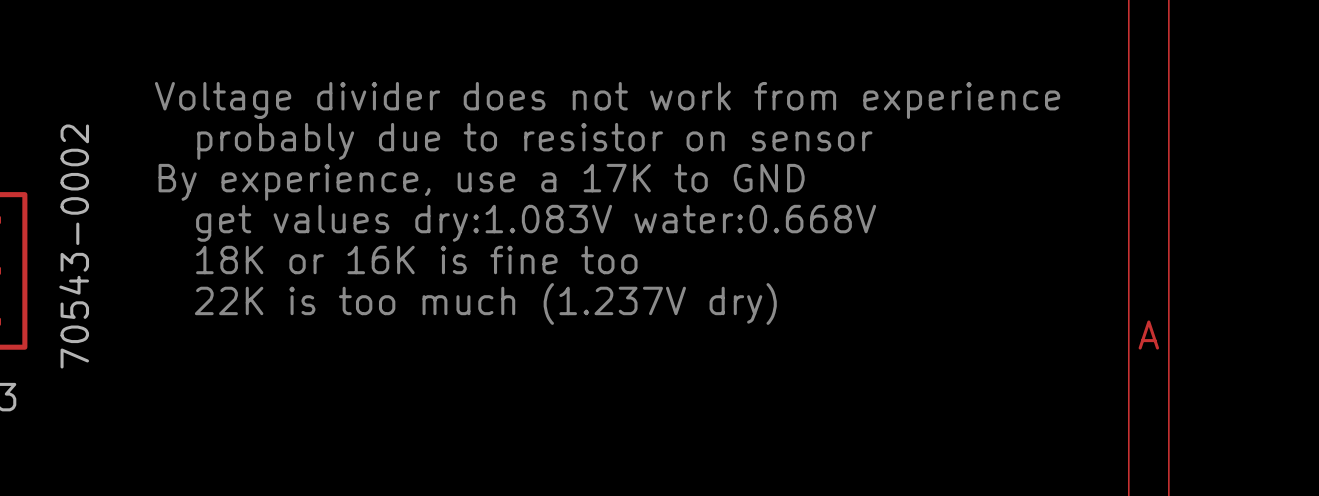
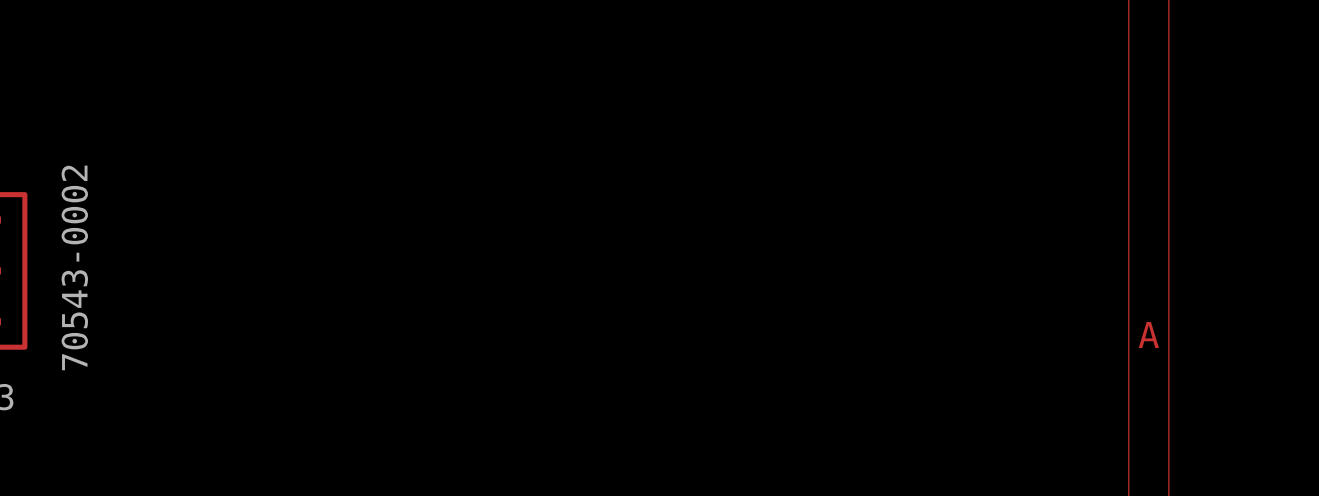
text: Voltage divider does not work from experience (607, 100) -> none
text: probably due to resistor on sensor (534, 141) -> none
text: By experience, use a 17K to GND (481, 182) -> none
text: get values dry:1.083V water:0.668V (536, 223) -> none
text: 18K or 16K is fine too (416, 260) -> none
text: 22K is too much (1.237V dry) (485, 303) -> none

